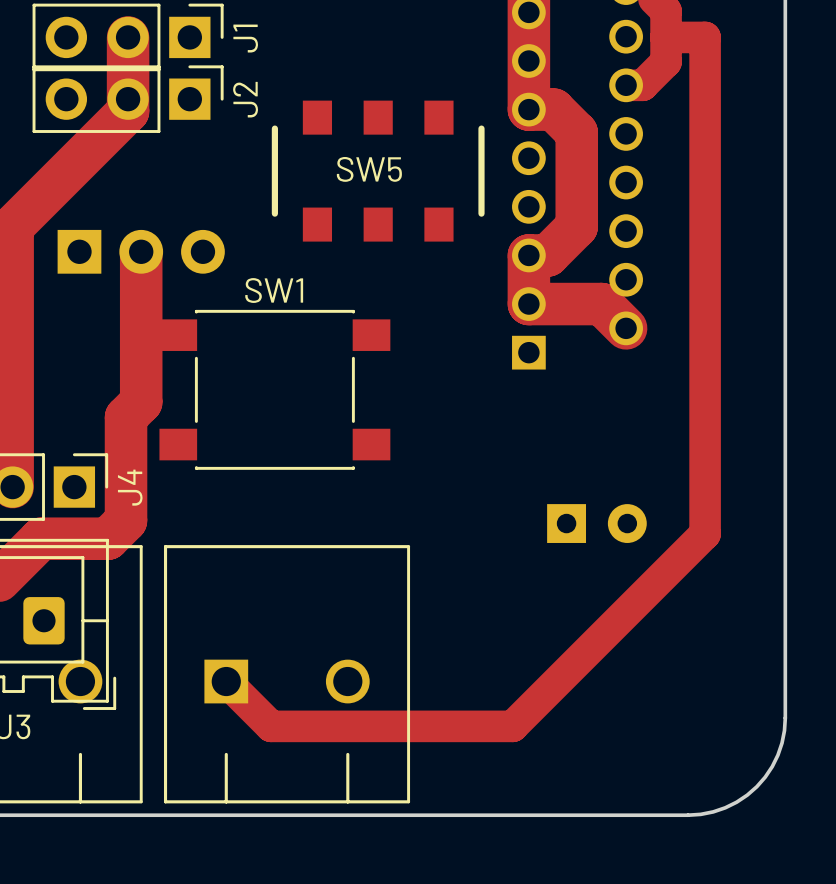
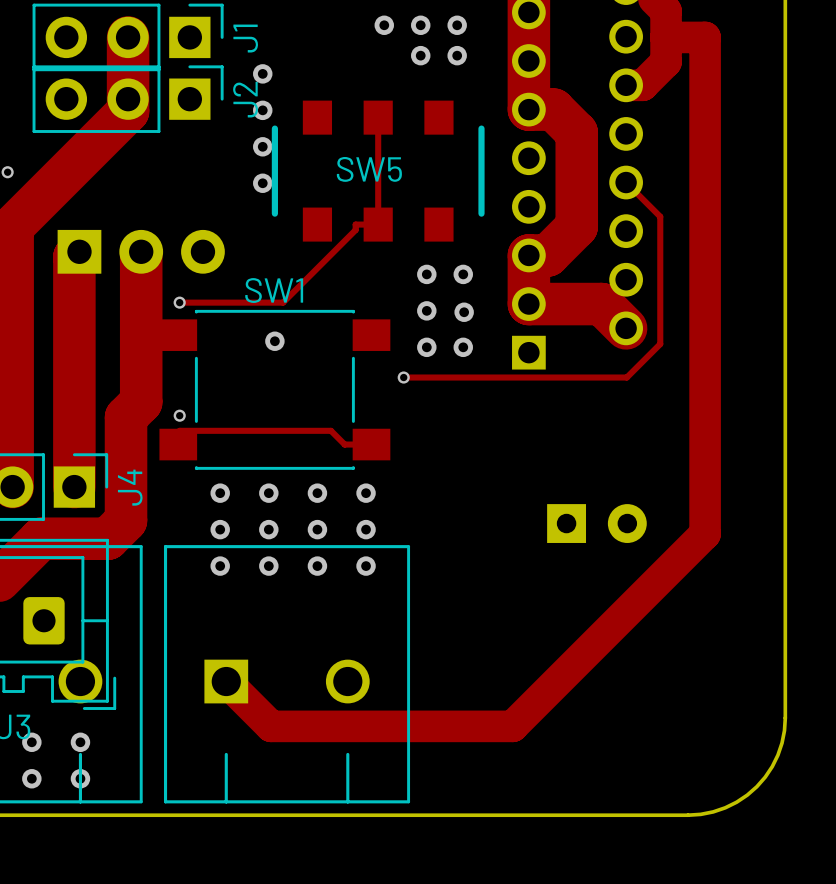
via: none -> (384, 25)
via: none -> (420, 25)
via: none -> (457, 25)
via: none -> (420, 55)
via: none -> (457, 55)
via: none -> (262, 73)
via: none -> (262, 110)
track: none -> (378, 117) (378, 224) (355, 224) (355, 230) (283, 302) (179, 302)
via: none -> (262, 146)
via: none -> (7, 172)
track: none -> (626, 182) (660, 216) (660, 344) (626, 377) (403, 377)
via: none -> (262, 183)
track: none -> (79, 251) (74, 256) (74, 487)
via: none -> (426, 274)
via: none -> (463, 274)
via: none -> (179, 302)
via: none -> (426, 310)
via: none -> (464, 312)
via: none -> (274, 341)
via: none -> (426, 347)
via: none -> (463, 347)
via: none -> (403, 377)
via: none -> (179, 415)
track: none -> (178, 444) (179, 430) (331, 430) (344, 444) (371, 444)
via: none -> (220, 493)
via: none -> (268, 493)
via: none -> (317, 493)
via: none -> (366, 493)
via: none -> (220, 529)
via: none -> (268, 529)
via: none -> (317, 529)
via: none -> (366, 529)
via: none -> (220, 566)
via: none -> (268, 566)
via: none -> (317, 566)
via: none -> (366, 566)
via: none -> (31, 742)
via: none -> (80, 742)
via: none -> (31, 778)
via: none -> (80, 778)

